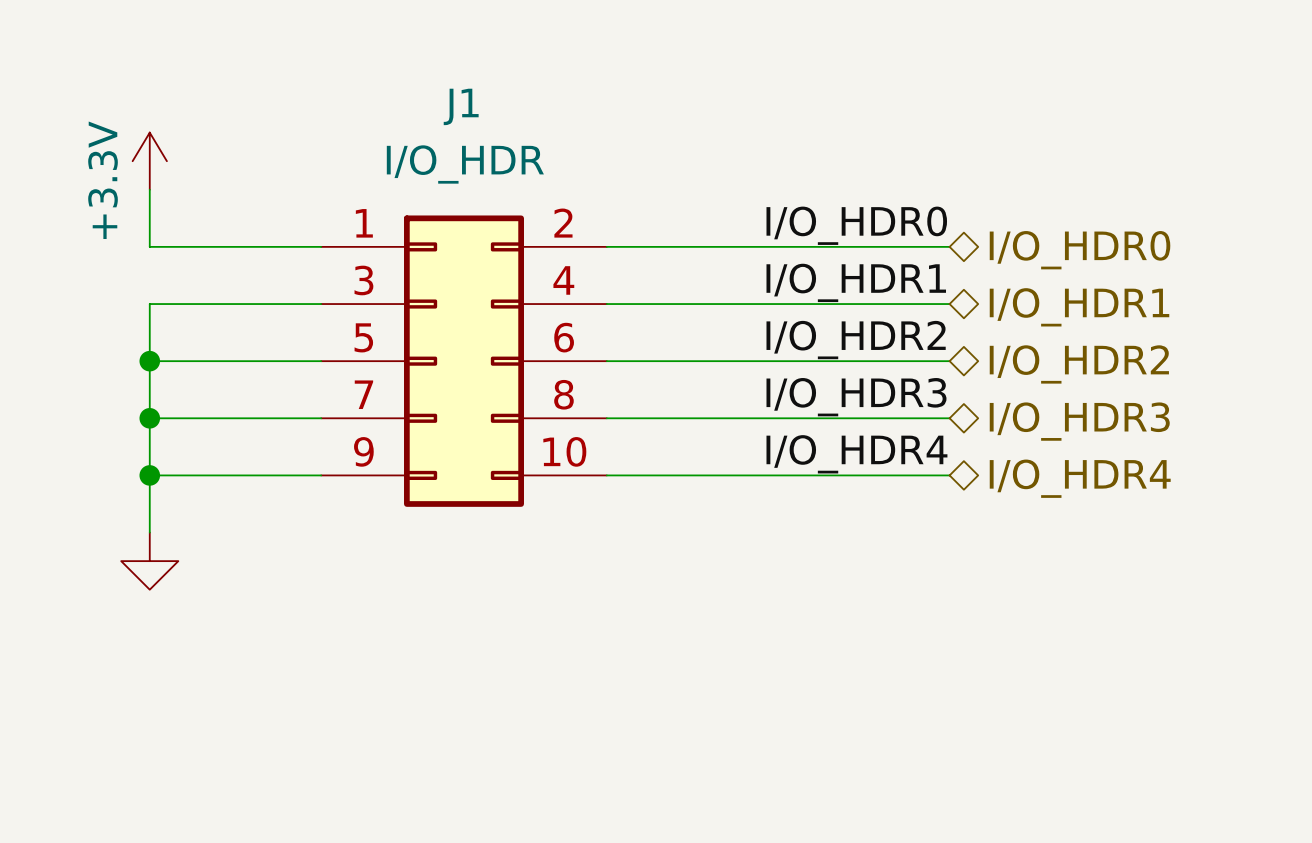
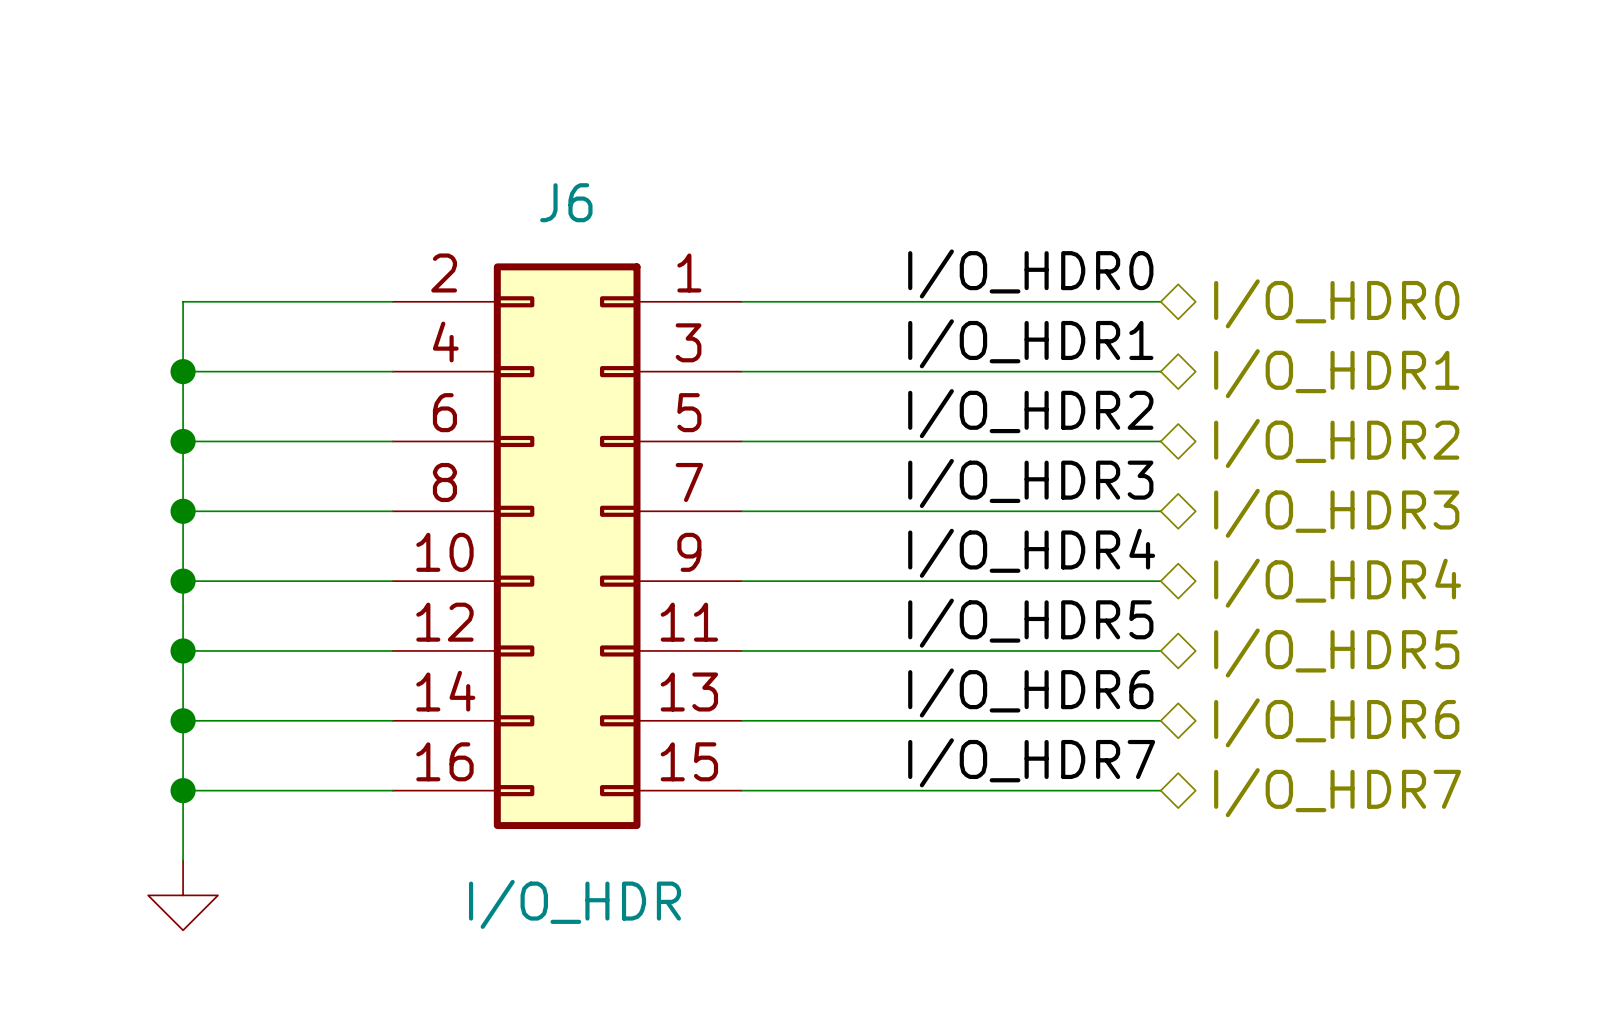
power symbol: +3.3V (149, 161) -> none
wire: (149, 189) (149, 246) -> (183, 371) (183, 301)
junction: none -> (183, 371)
J1: I/O_HDR (464, 361) -> none
J6: none -> I/O_HDR (567, 546)
label: none -> I/O_HDR5 (1030, 623)
junction: none -> (183, 650)
wire: none -> (392, 650) (183, 650) (183, 860)
wire: none -> (741, 650) (1160, 650)
hierarchical label: none -> I/O_HDR5 (1336, 652)
power symbol position: (149, 561) -> (183, 895)
label: none -> I/O_HDR6 (1030, 692)
wire: none -> (183, 720) (392, 720)
junction: none -> (183, 720)
wire: none -> (741, 720) (1160, 720)
hierarchical label: none -> I/O_HDR6 (1336, 722)
label: none -> I/O_HDR7 (1031, 762)
wire: none -> (183, 790) (392, 790)
junction: none -> (183, 790)
wire: none -> (741, 790) (1160, 790)
hierarchical label: none -> I/O_HDR7 (1337, 792)

